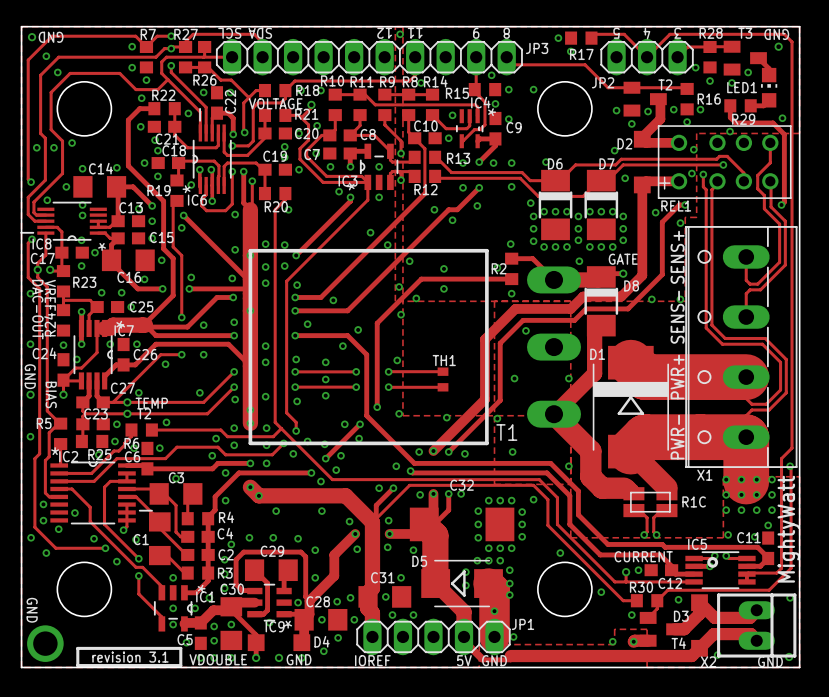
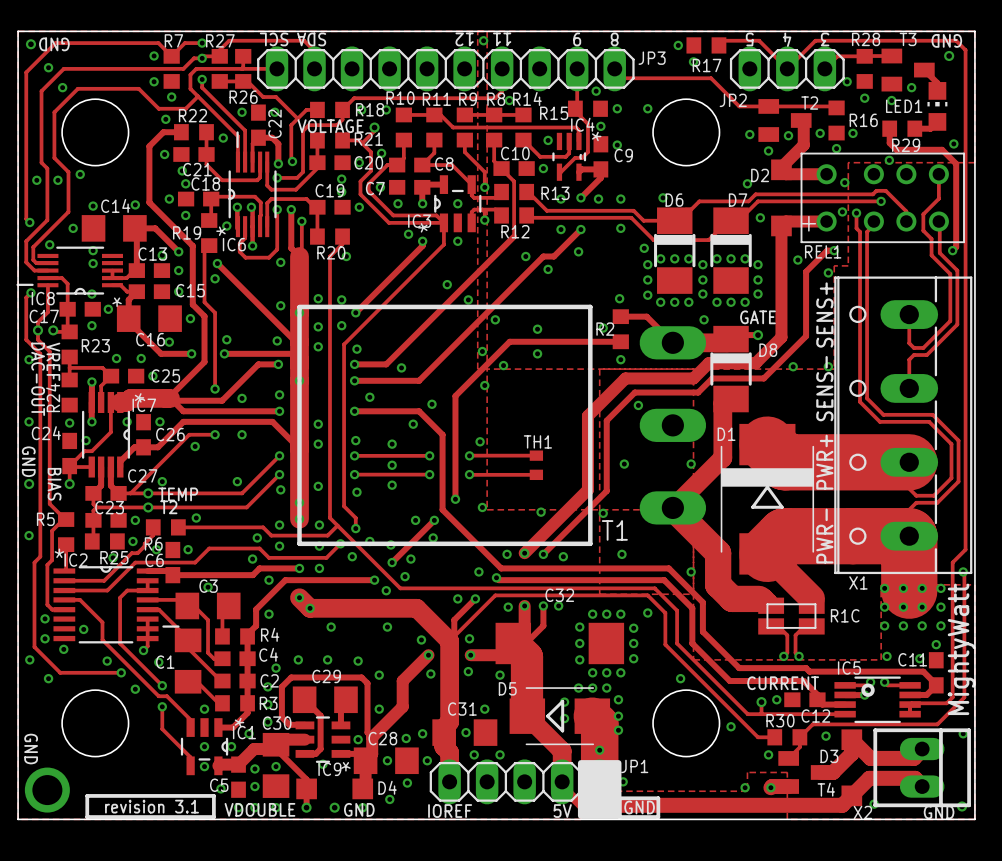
drawing: none -> [577, 760, 622, 819]
line: none -> (619, 798) (619, 817) (658, 817) (658, 798) (619, 798)
text position: GND (494, 660) -> GND (639, 807)

